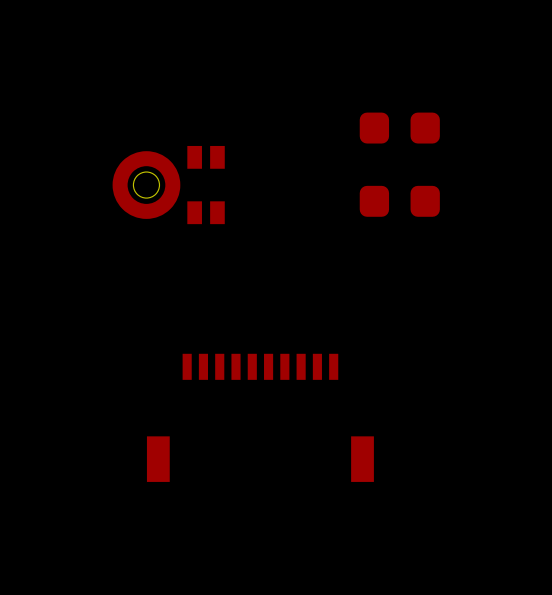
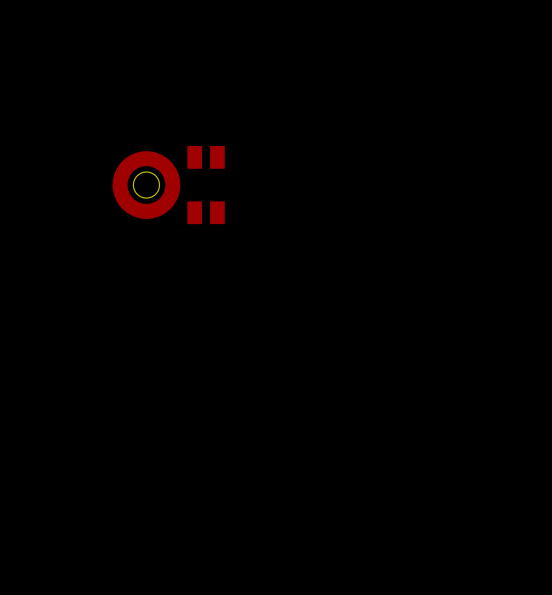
part: (399, 128) -> none
part: (399, 201) -> none
part: (260, 417) -> none

